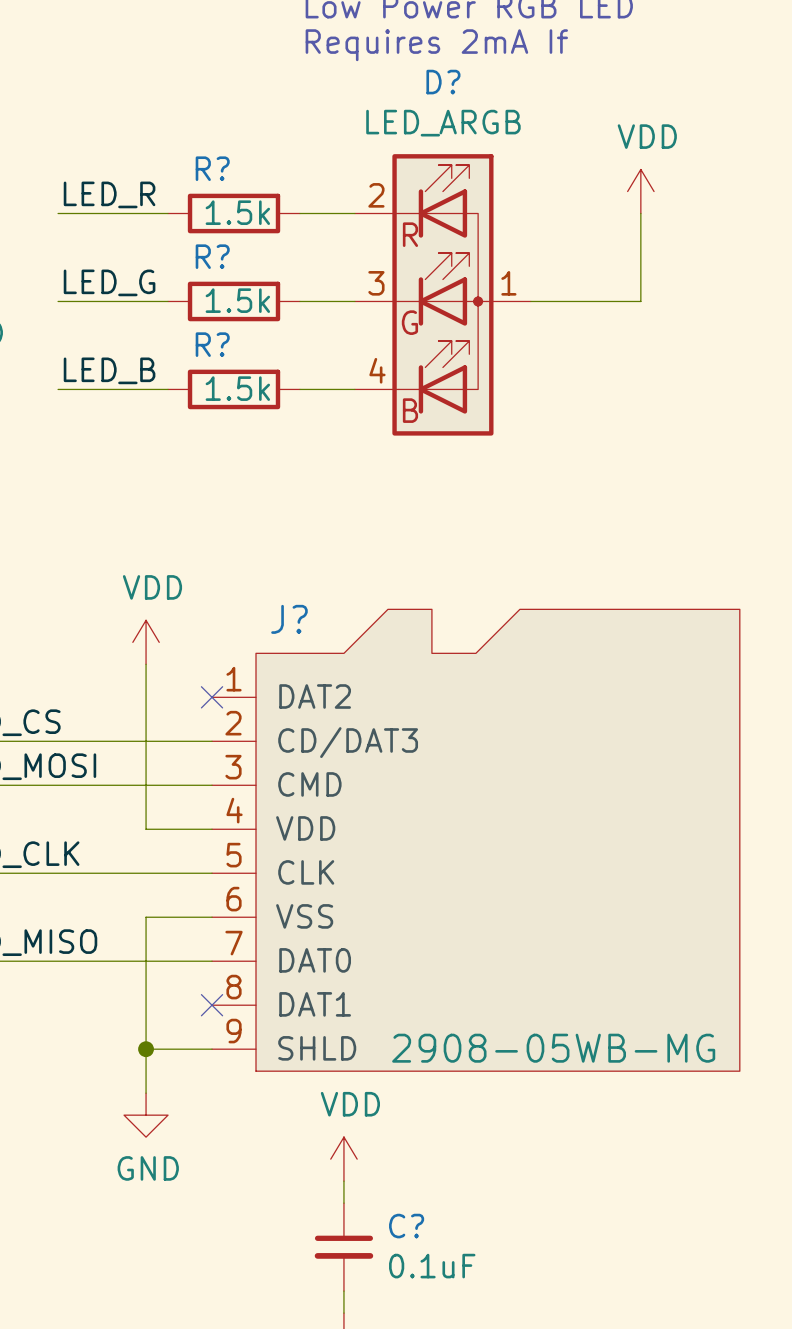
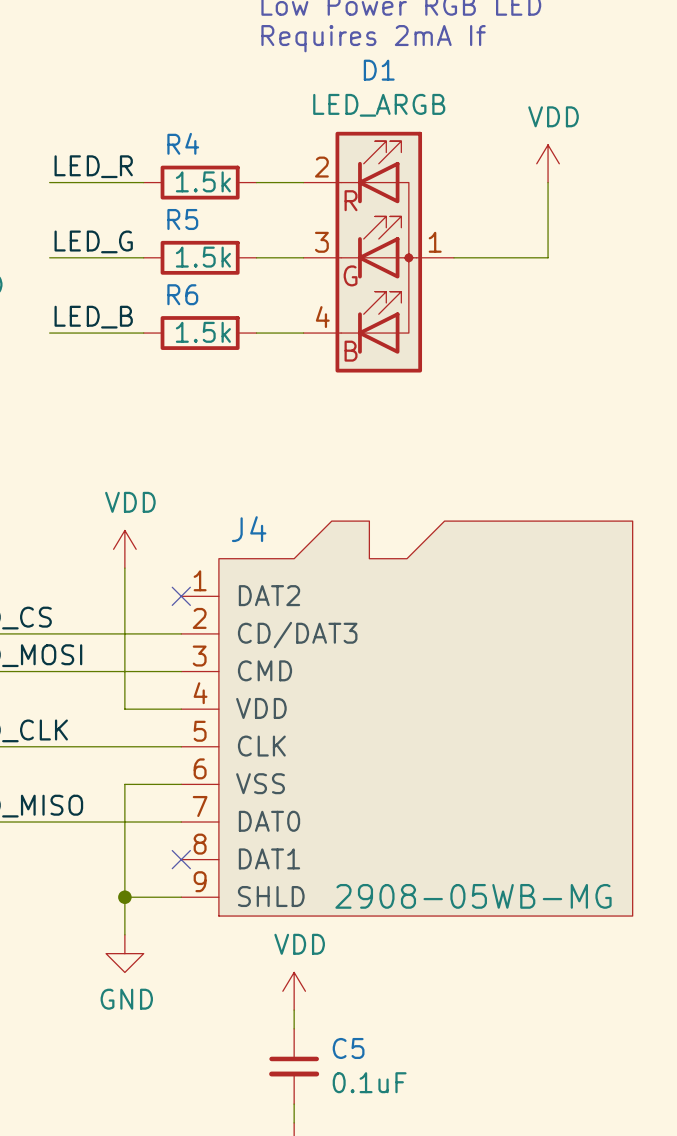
D? name: D? (443, 82) -> D1 (379, 70)
R? name: R? (212, 168) -> R4 (183, 143)
R? name: R? (212, 256) -> R5 (182, 219)
R? name: R? (212, 344) -> R6 (182, 294)
J? name: J? (289, 619) -> J4 (249, 529)
C? name: C? (406, 1226) -> C5 (348, 1048)

